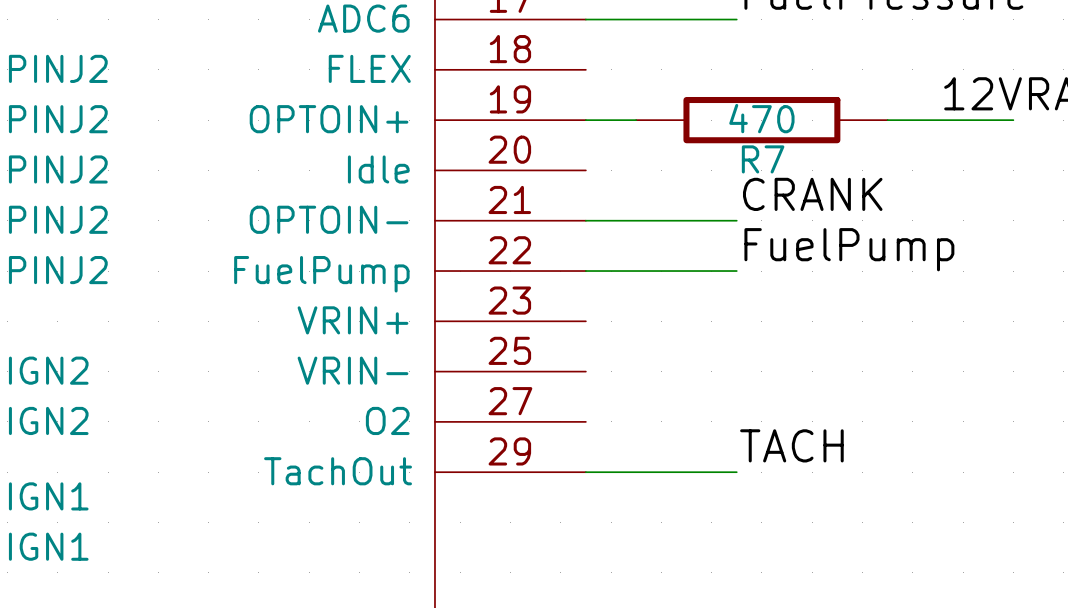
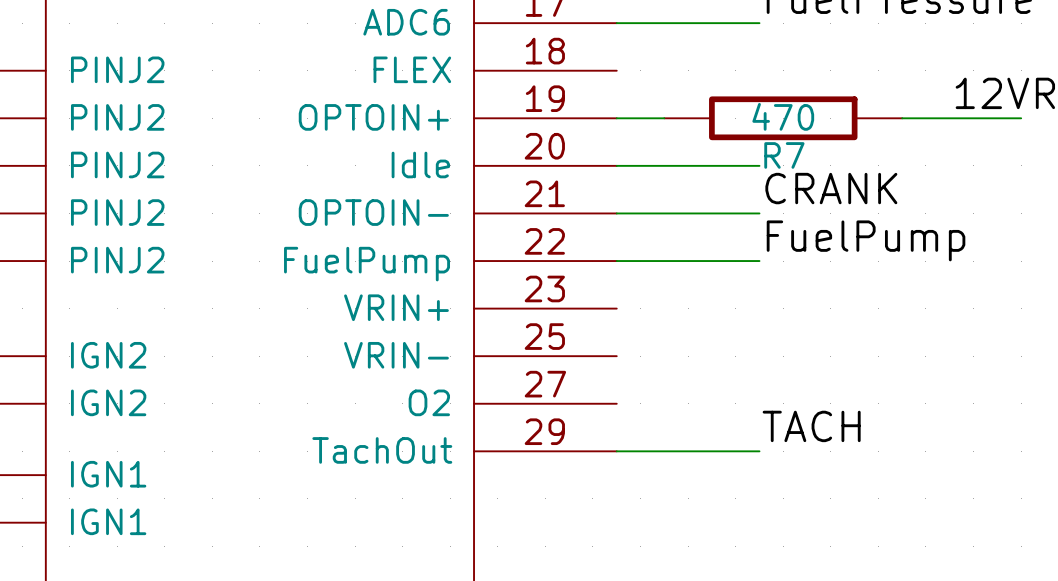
wire: none -> (616, 165) (759, 165)

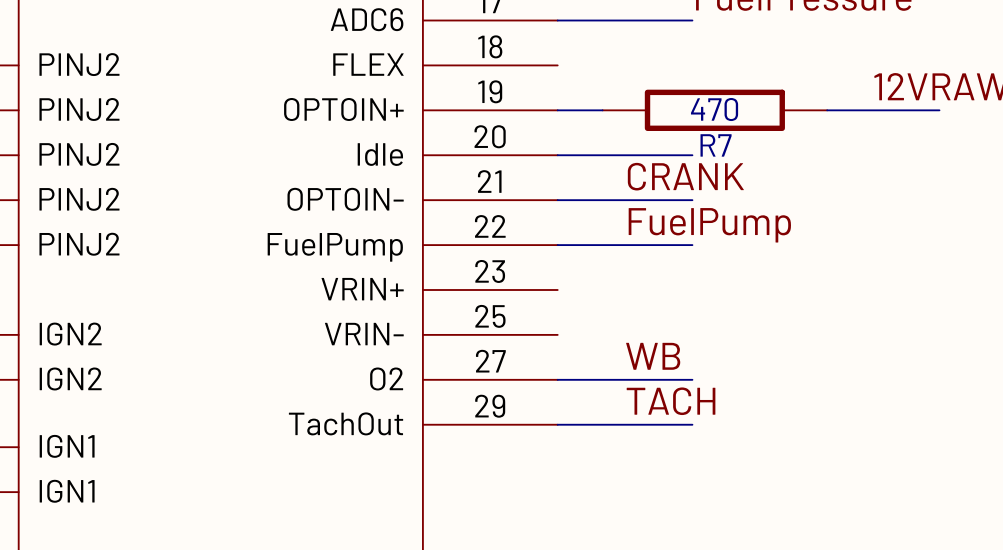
label position: CRANK (831, 188) -> CRANK (685, 176)
label position: FuelPump (866, 240) -> FuelPump (709, 225)
label: none -> WB (653, 356)
wire: none -> (557, 379) (692, 379)
label position: TACH (811, 426) -> TACH (671, 401)

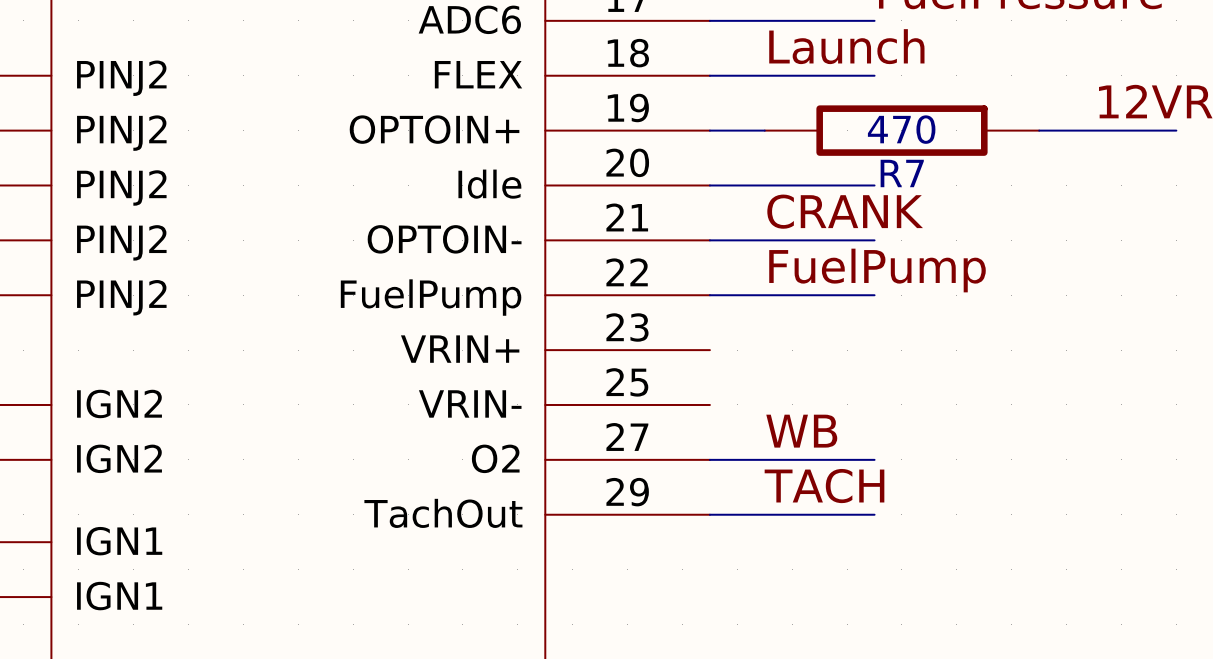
label: none -> Launch (846, 46)
wire: none -> (709, 75) (874, 75)
label position: CRANK (685, 176) -> CRANK (845, 211)
label position: FuelPump (709, 225) -> FuelPump (877, 270)
label position: WB (653, 356) -> WB (801, 431)
label position: TACH (671, 401) -> TACH (824, 486)

